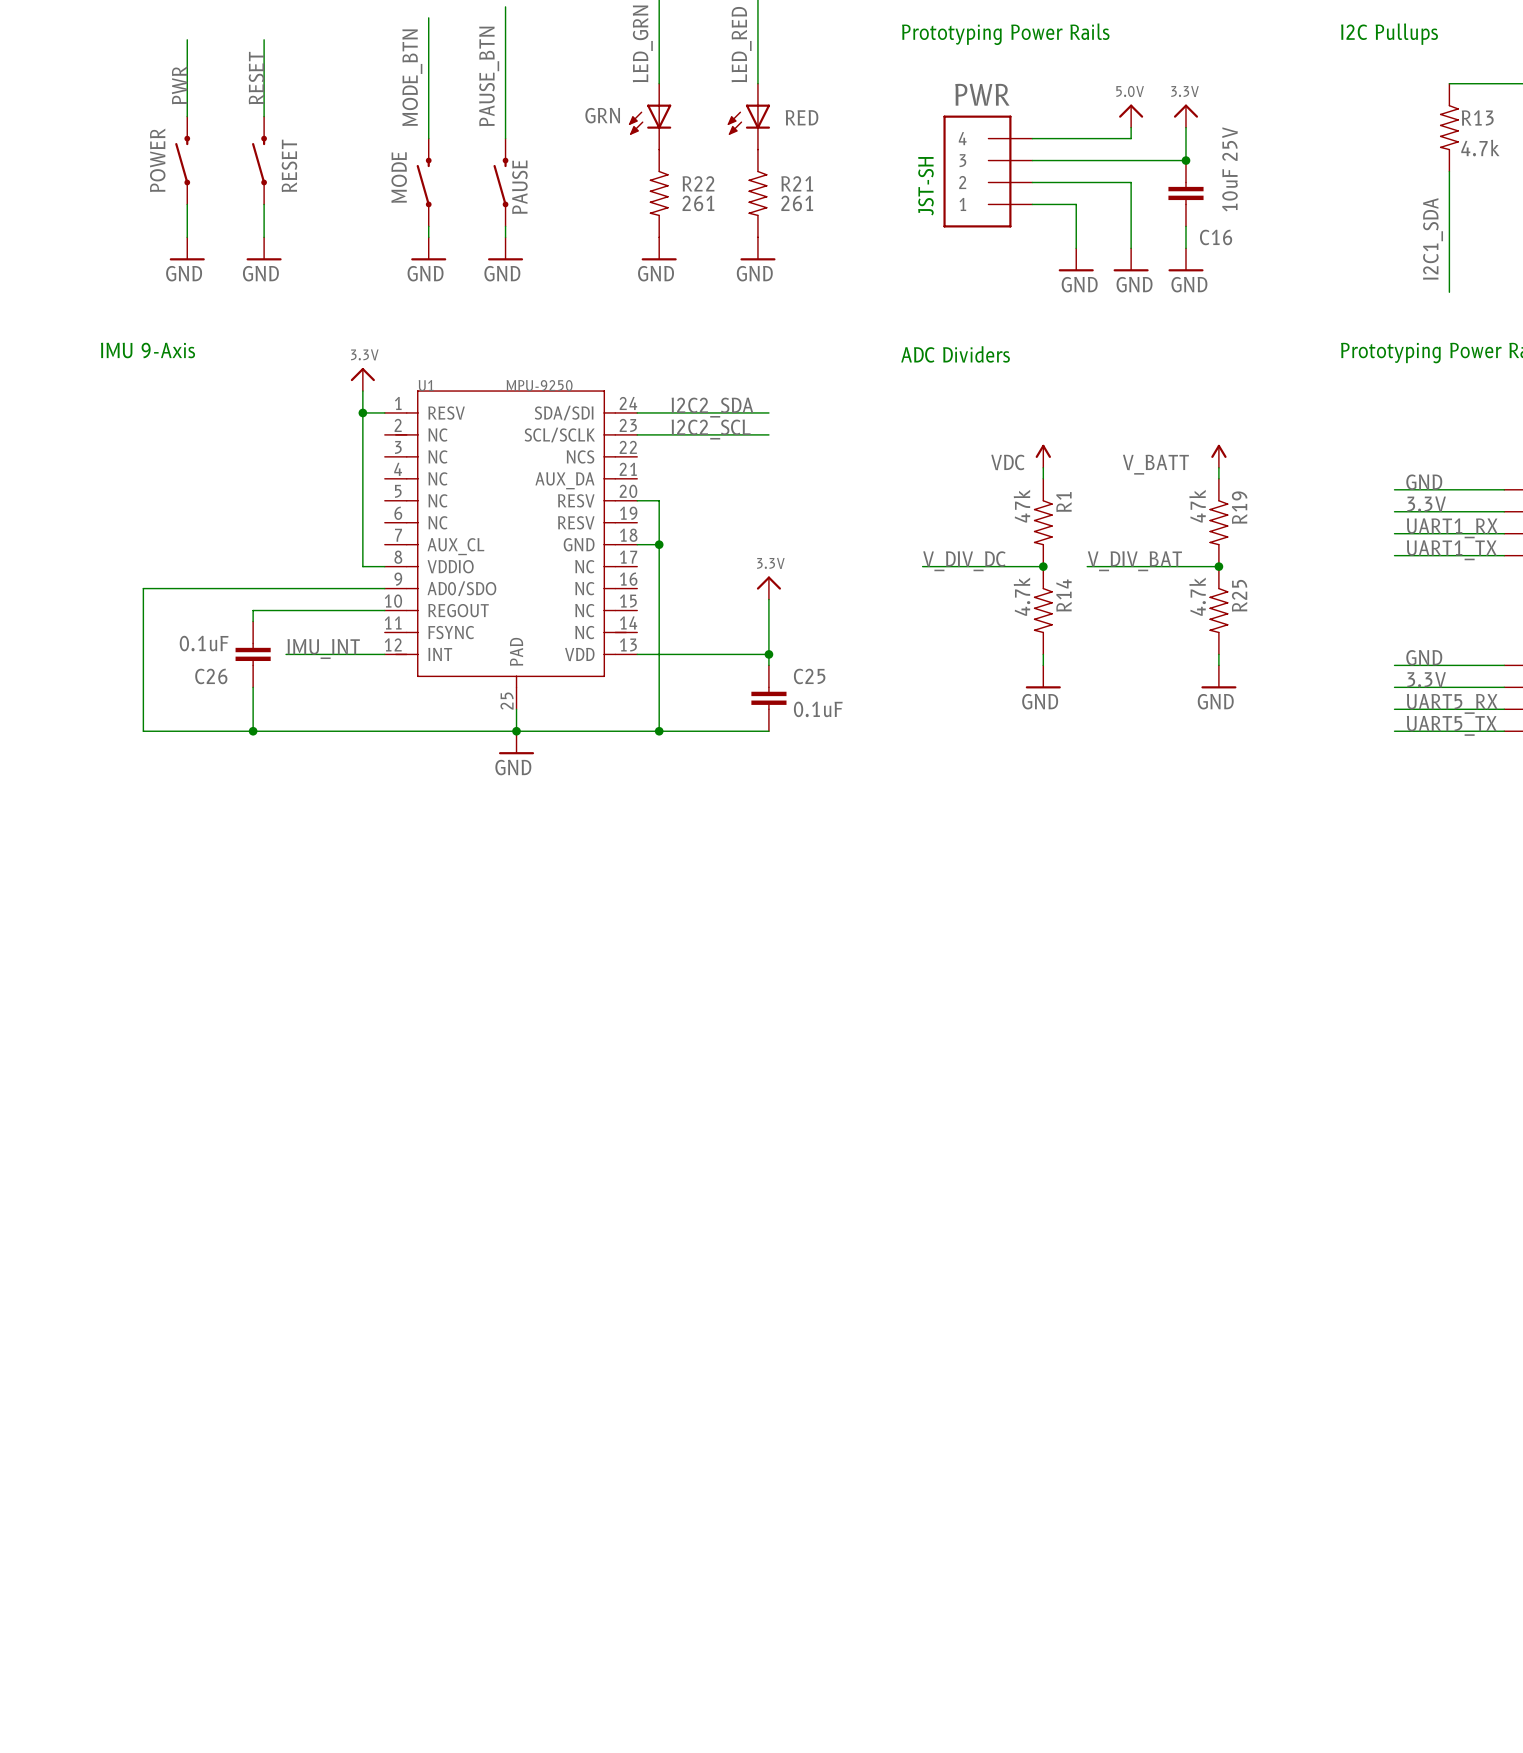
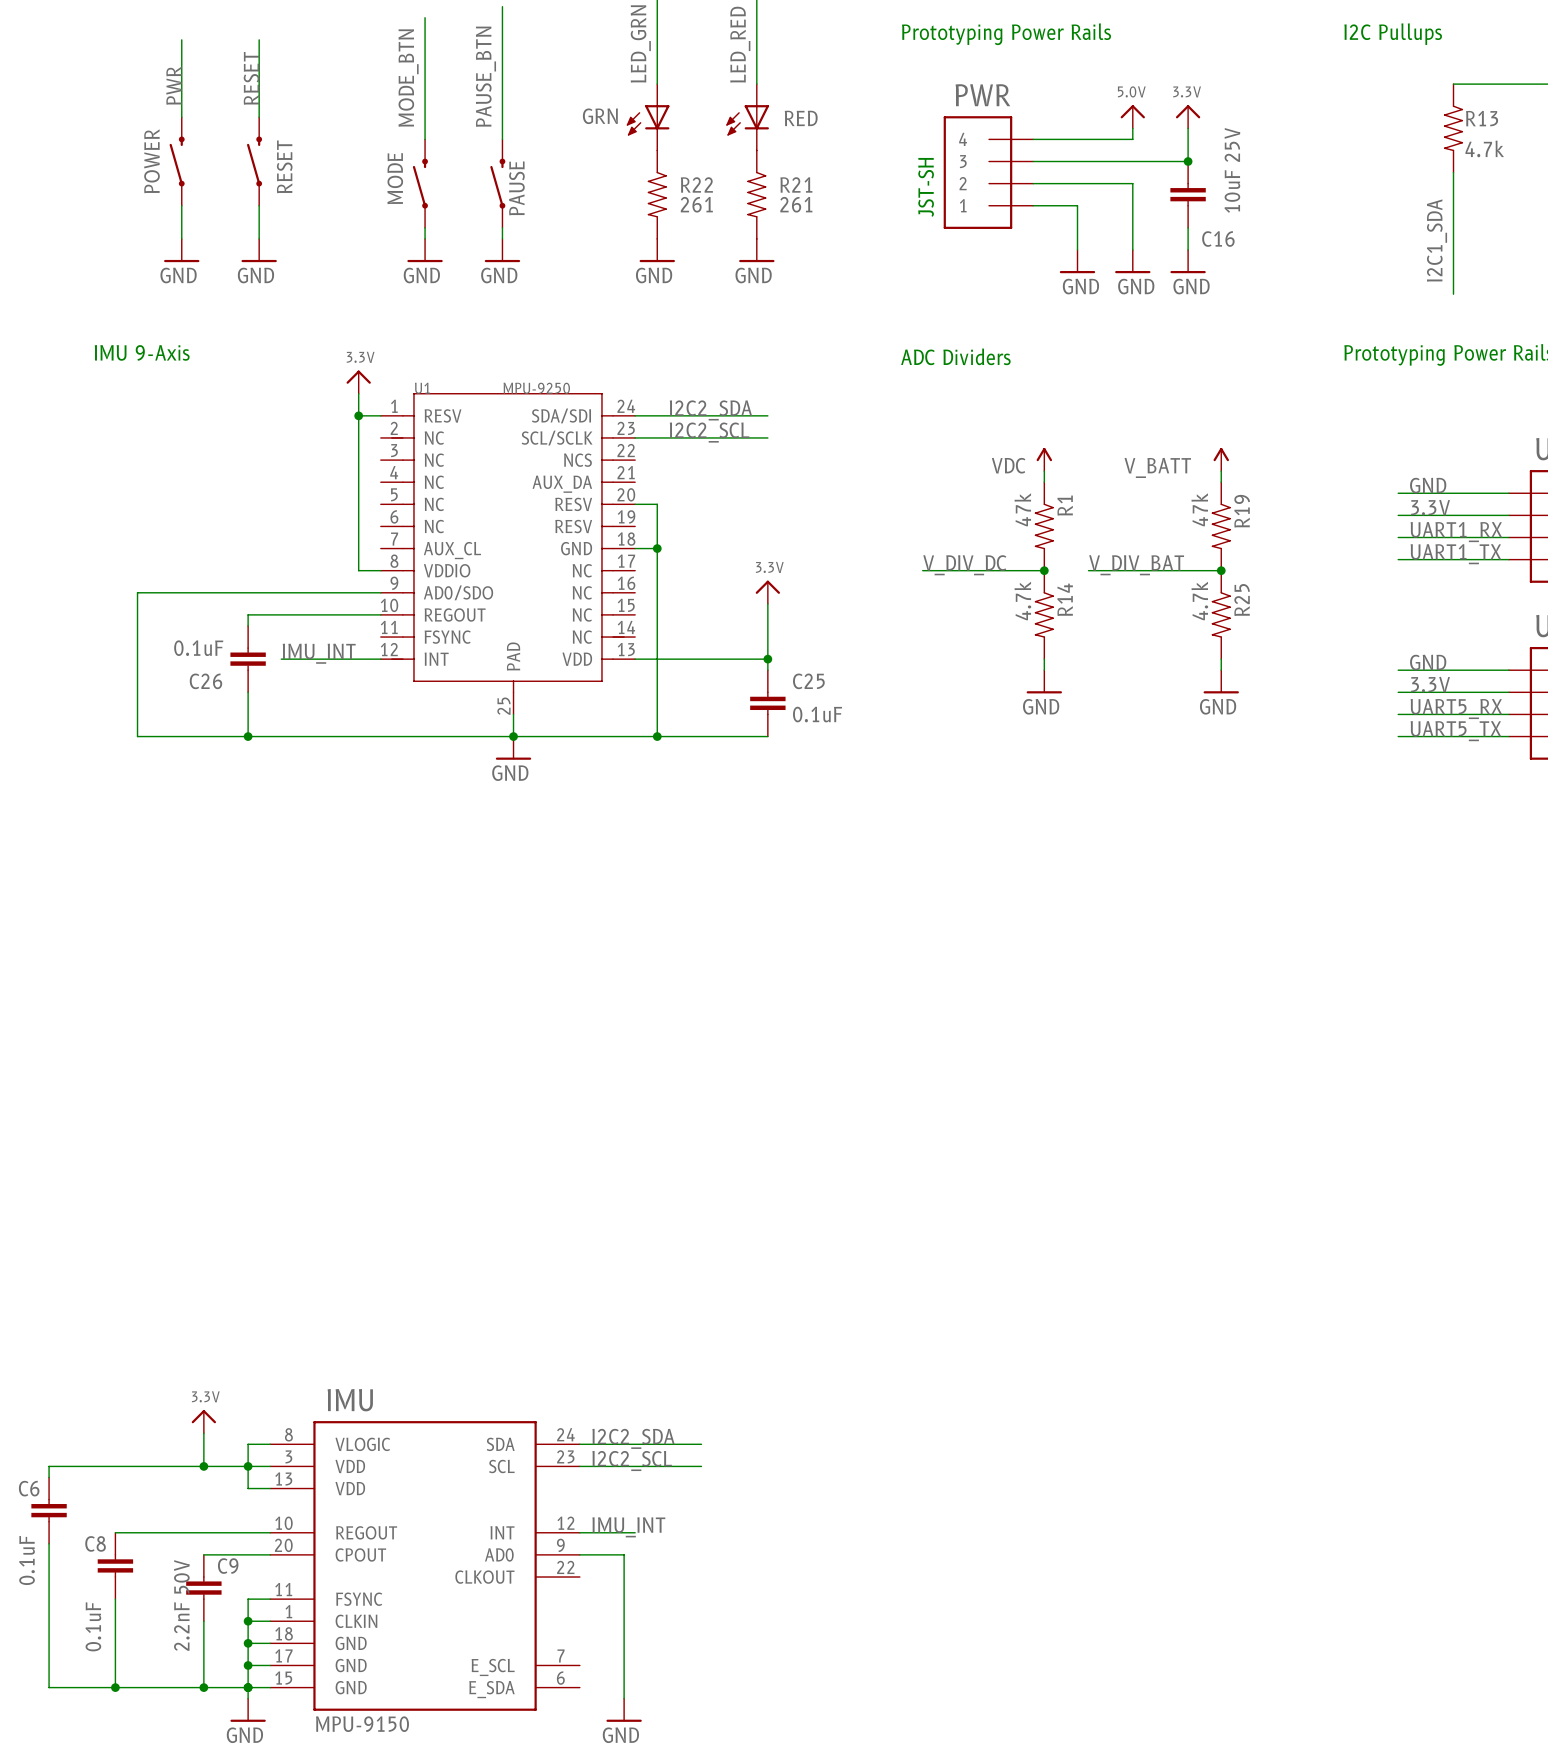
power symbol: none -> 3.3V (203, 1421)
wire: none -> (203, 1433) (203, 1466)
label: none -> I2C2_SDA (633, 1438)
wire: none -> (270, 1444) (248, 1444) (248, 1488) (270, 1488)
wire: none -> (579, 1444) (701, 1444)
label: none -> I2C2_SCL (632, 1460)
junction: none -> (203, 1466)
junction: none -> (248, 1466)
wire: none -> (270, 1466) (49, 1466) (49, 1477)
wire: none -> (579, 1466) (701, 1466)
C6: none -> 0.1uF (49, 1510)
label: none -> IMU_INT (628, 1527)
wire: none -> (115, 1532) (270, 1532)
wire: none -> (579, 1532) (635, 1532)
wire: none -> (49, 1543) (49, 1687) (270, 1687)
wire: none -> (203, 1554) (270, 1554)
wire: none -> (579, 1554) (624, 1554) (624, 1698)
C8: none -> 0.1uF (115, 1565)
IMU: none -> MPU-9150 (425, 1565)
C9: none -> 2.2nF 50V (203, 1588)
wire: none -> (115, 1599) (115, 1687)
wire: none -> (270, 1599) (248, 1599) (248, 1698)
wire: none -> (203, 1621) (203, 1687)
wire: none -> (248, 1621) (270, 1621)
junction: none -> (248, 1621)
wire: none -> (248, 1643) (270, 1643)
junction: none -> (248, 1643)
wire: none -> (248, 1665) (270, 1665)
junction: none -> (248, 1665)
junction: none -> (115, 1687)
junction: none -> (203, 1687)
junction: none -> (248, 1687)
power symbol: none -> GND (248, 1710)
power symbol: none -> GND (624, 1710)

